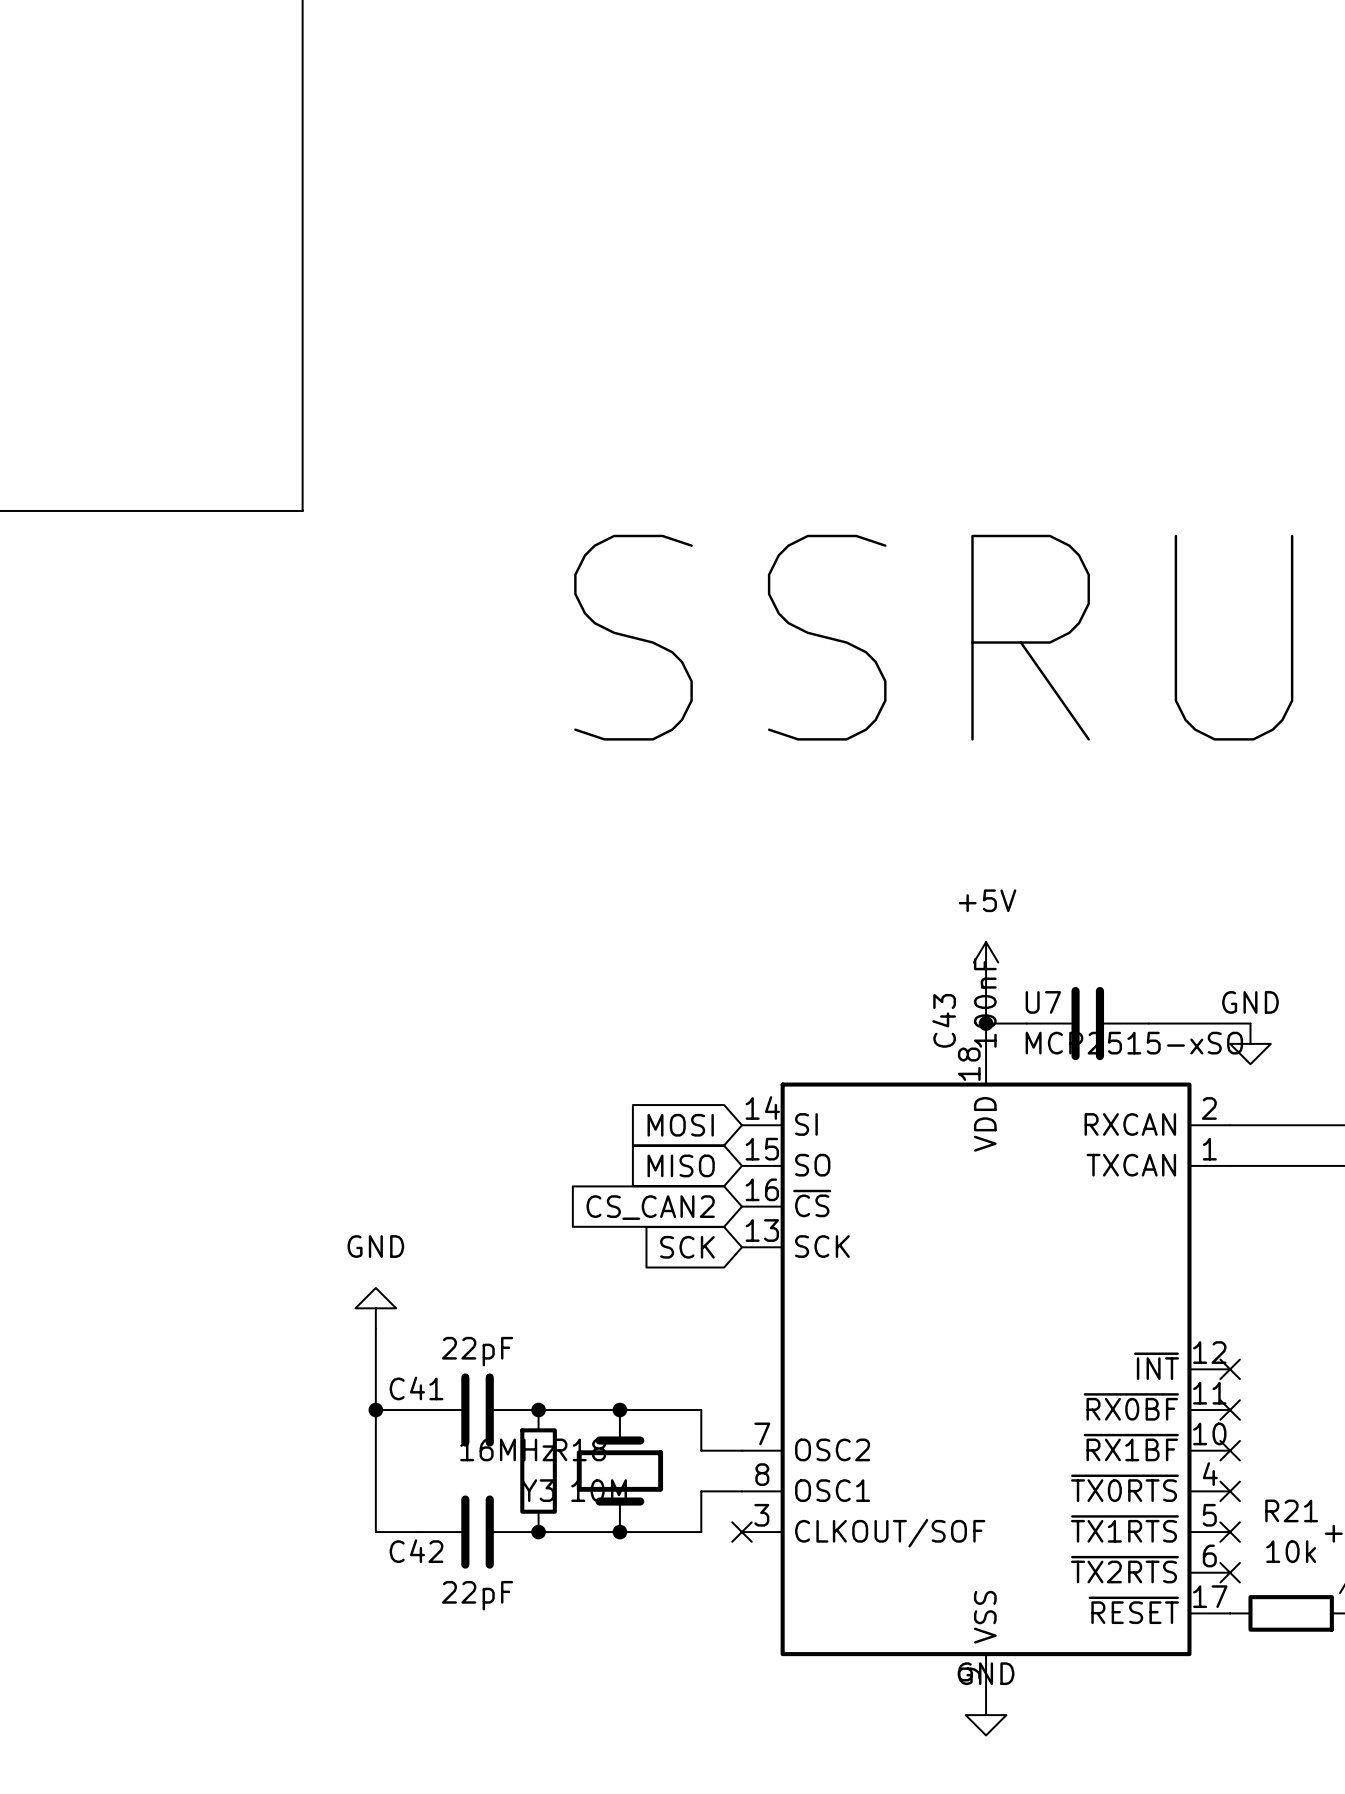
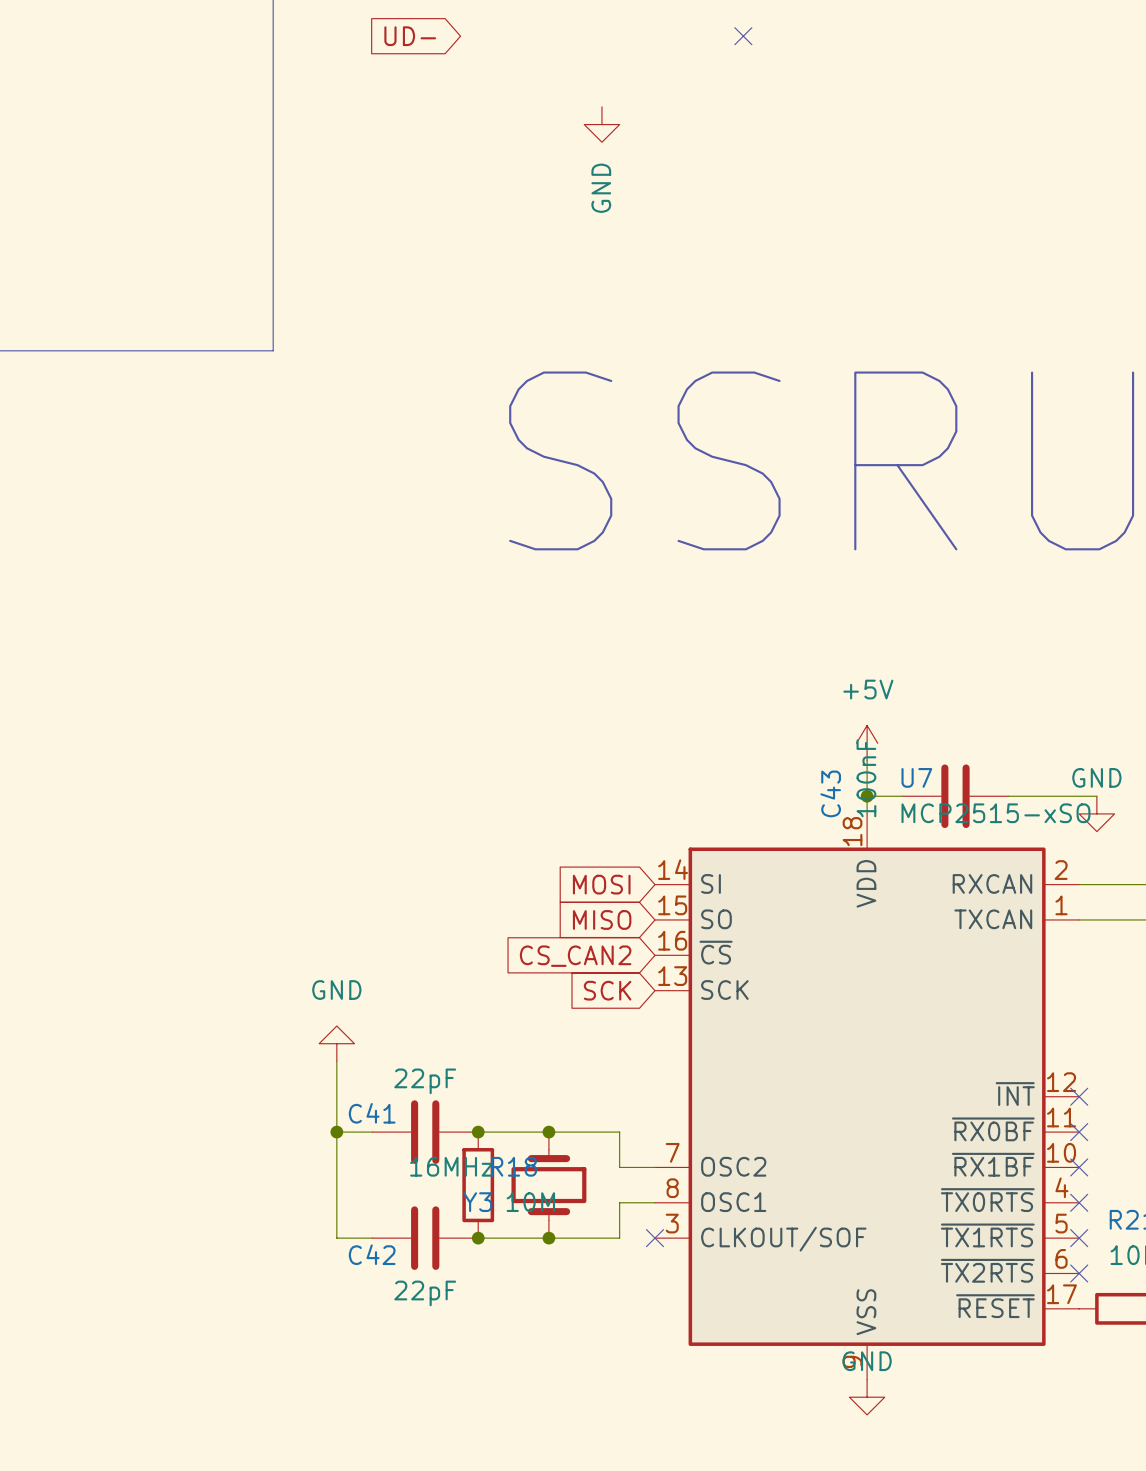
global label: none -> UD- (410, 36)
no-connect mark: none -> (743, 36)
power symbol: none -> GND (601, 124)

